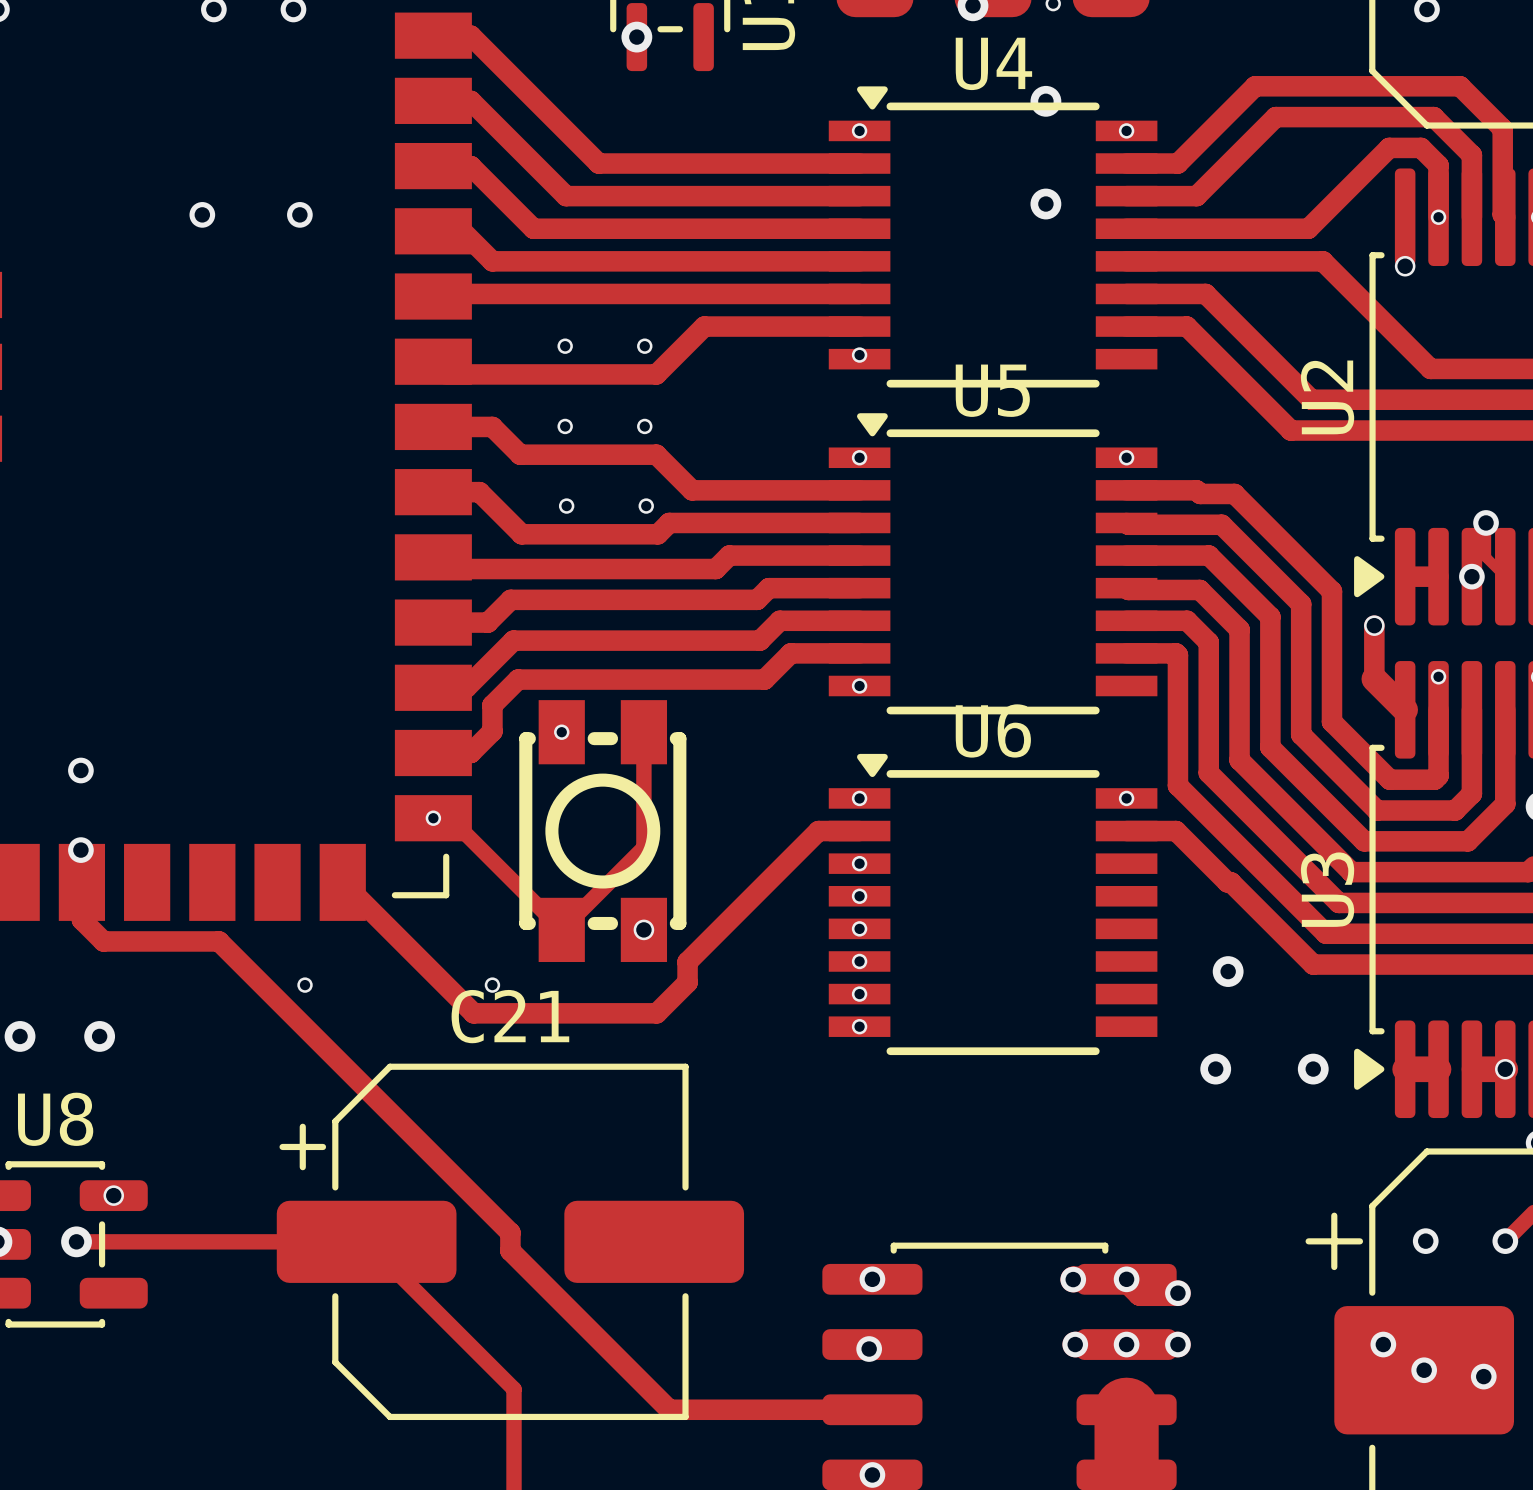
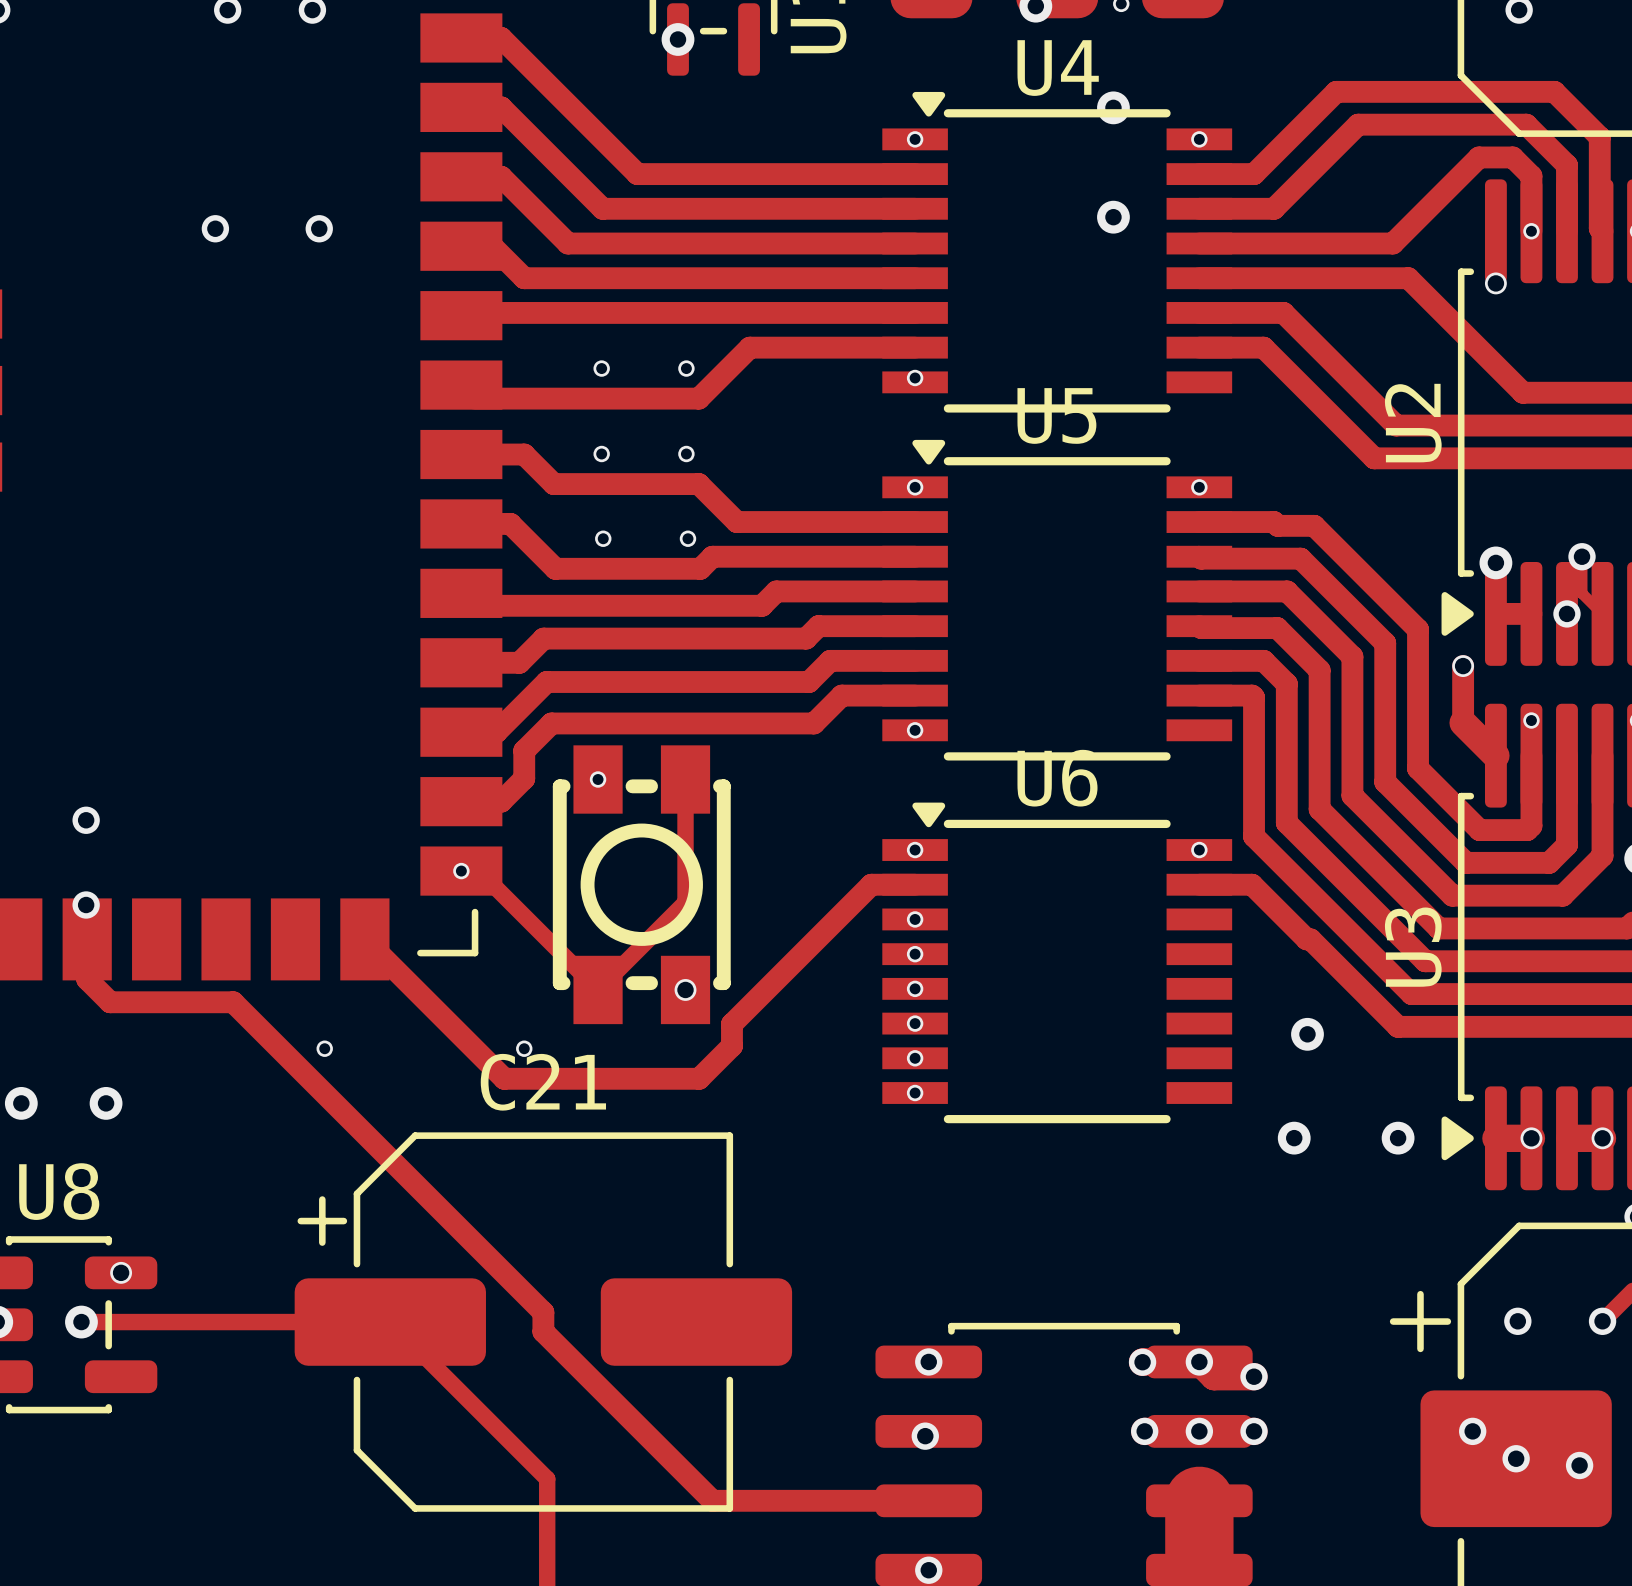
via: none -> (1495, 562)
via: none -> (1531, 1138)

